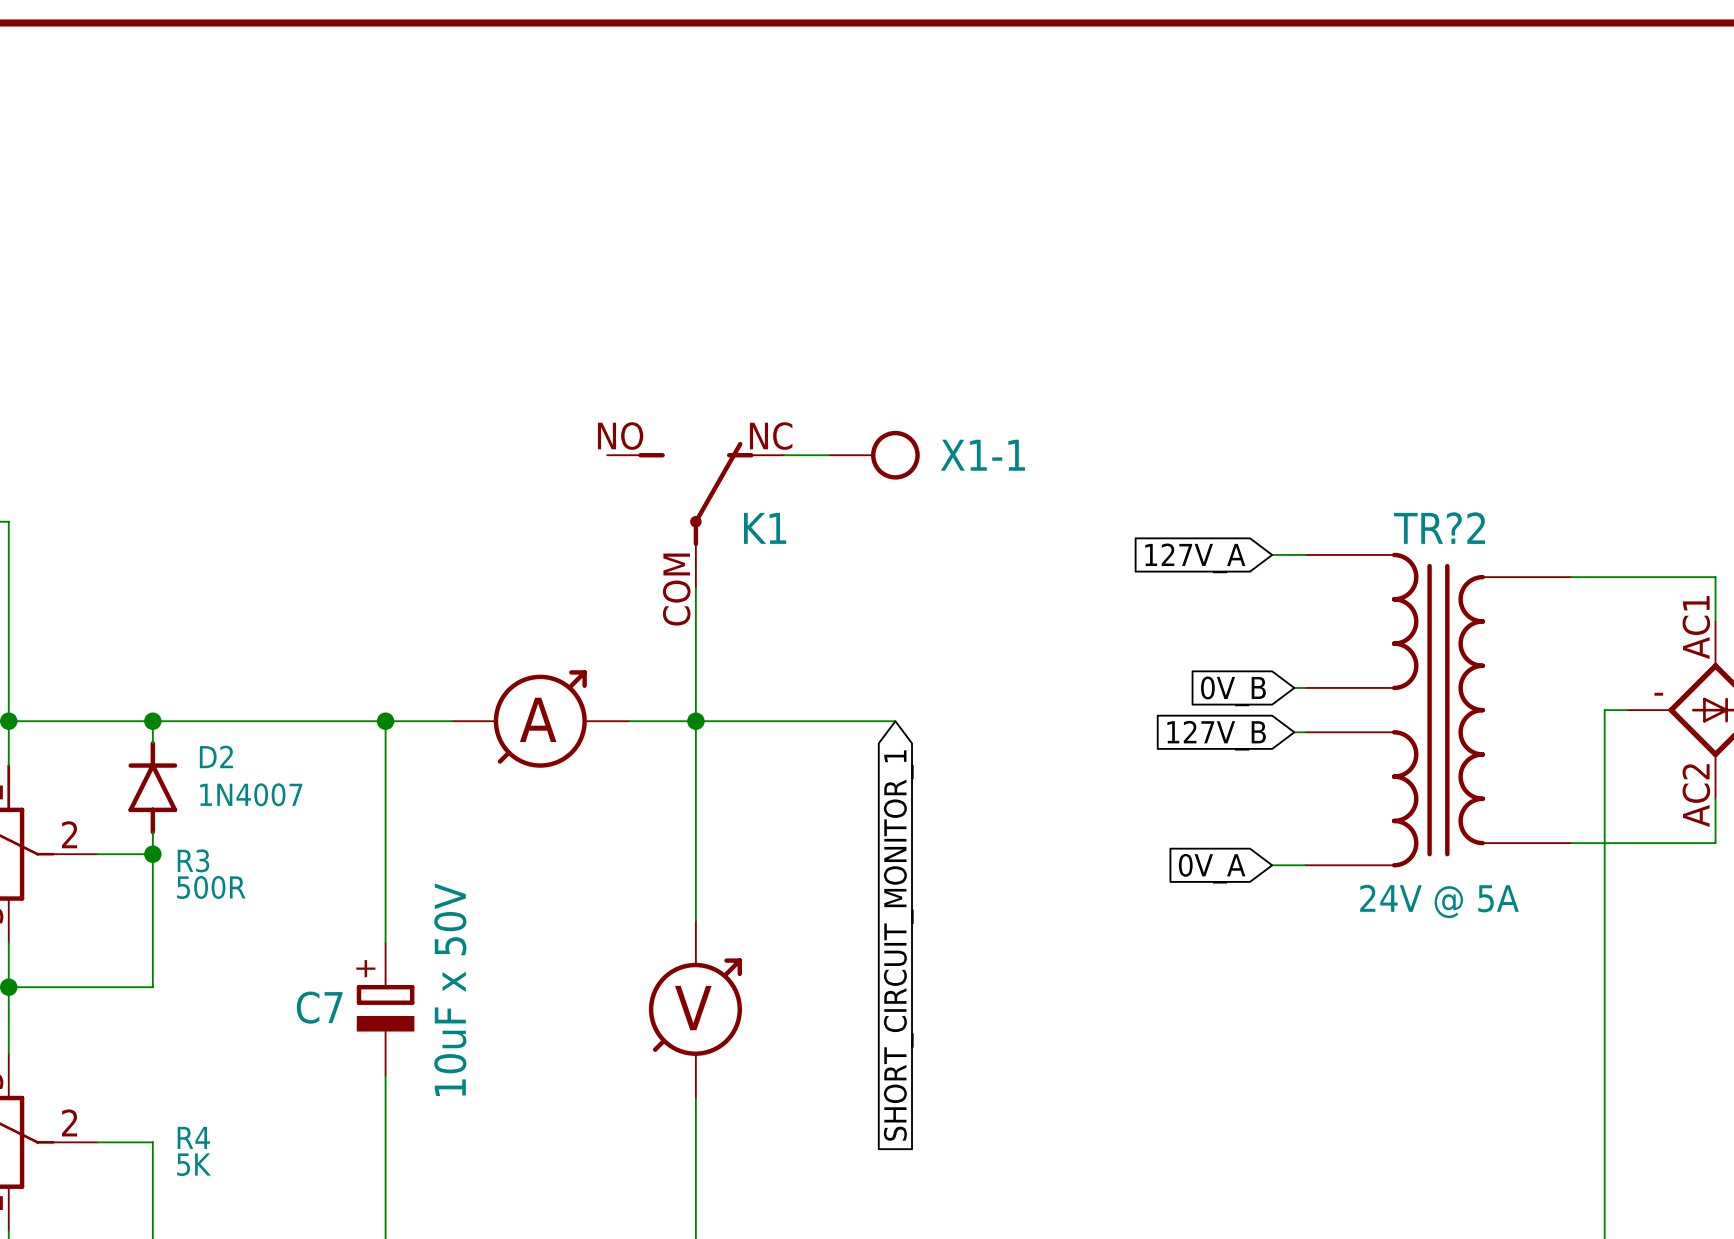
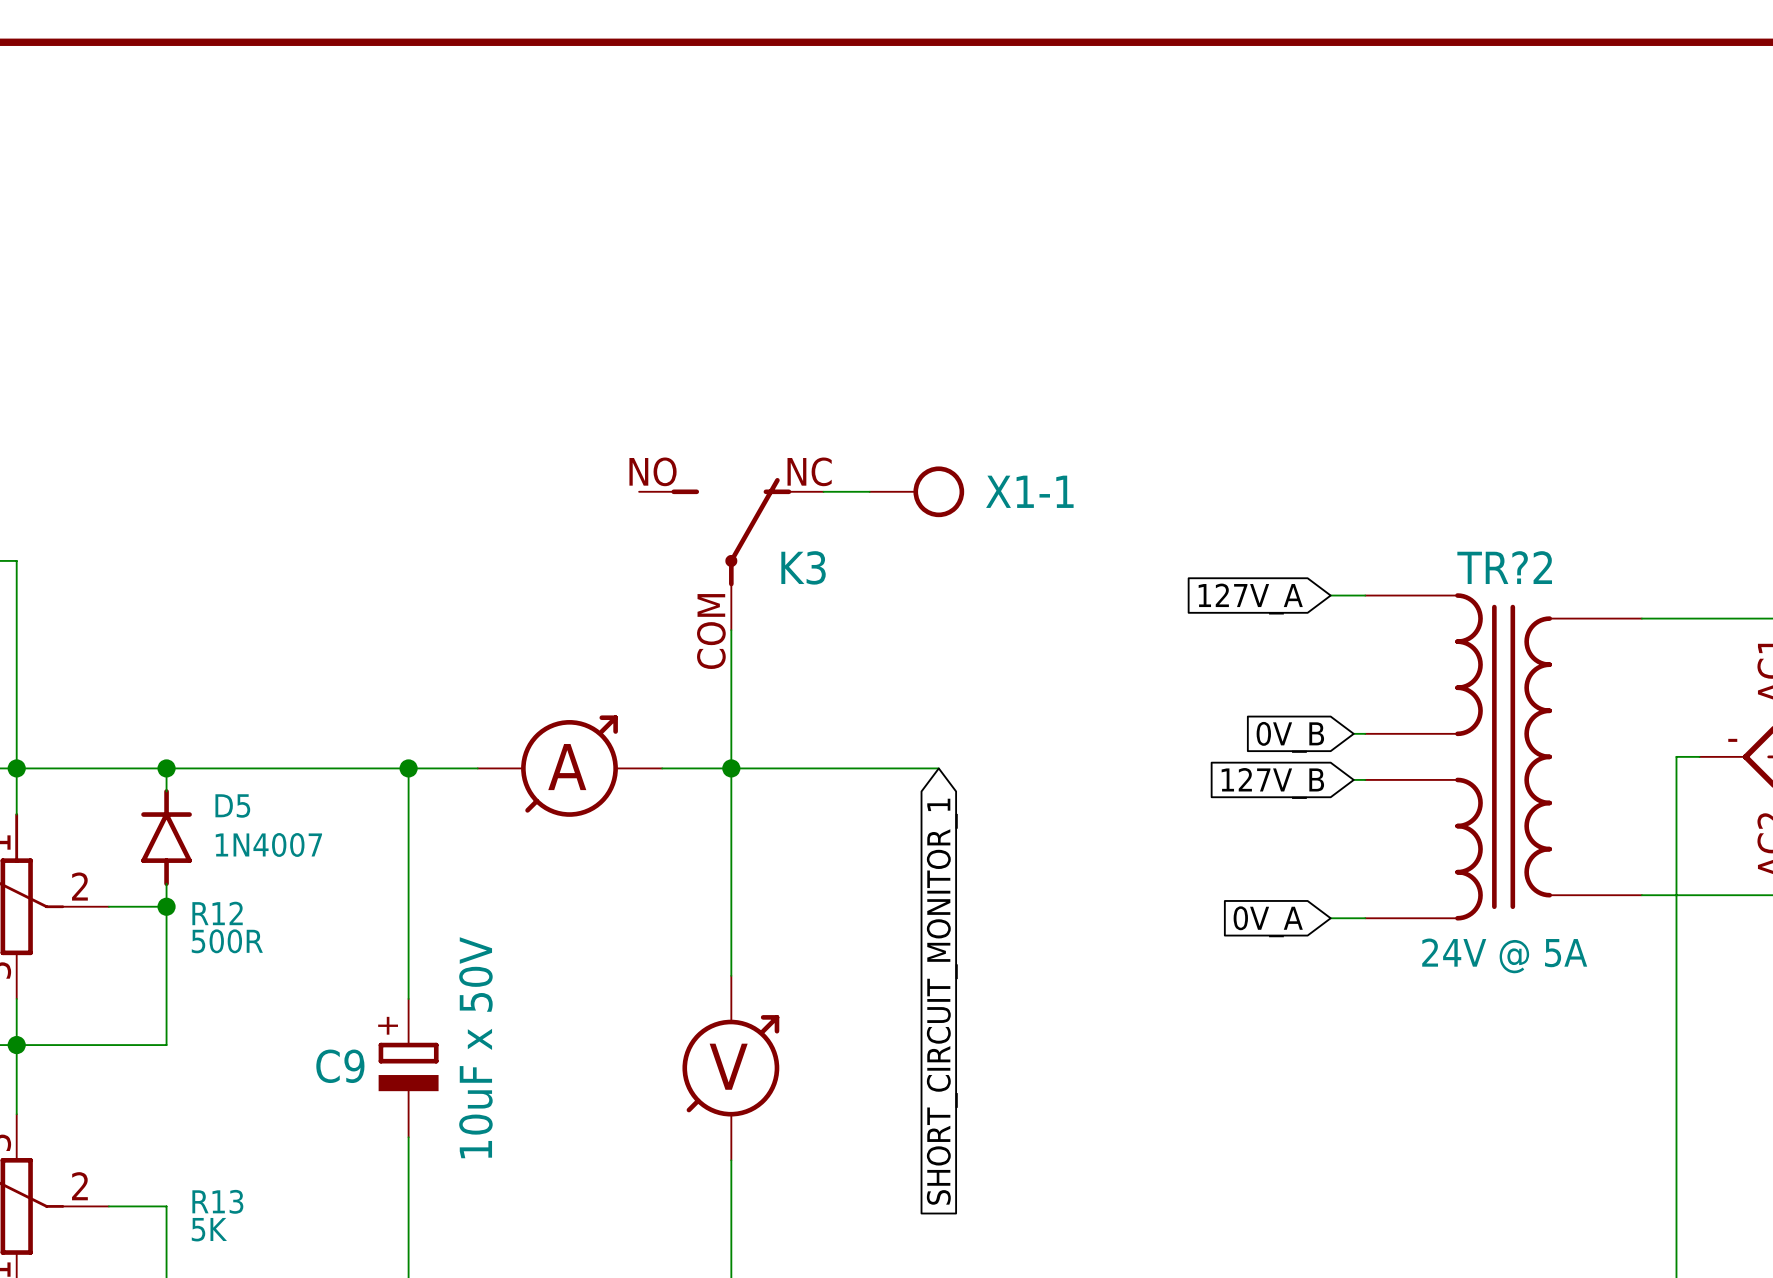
K1 name: K1 (765, 528) -> K3 (803, 567)
D2 name: D2 (216, 756) -> D5 (232, 805)
R3 name: R3 (193, 860) -> R12 (217, 913)
C7 name: C7 (319, 1007) -> C9 (340, 1066)
R4 name: R4 (193, 1137) -> R13 (217, 1201)

